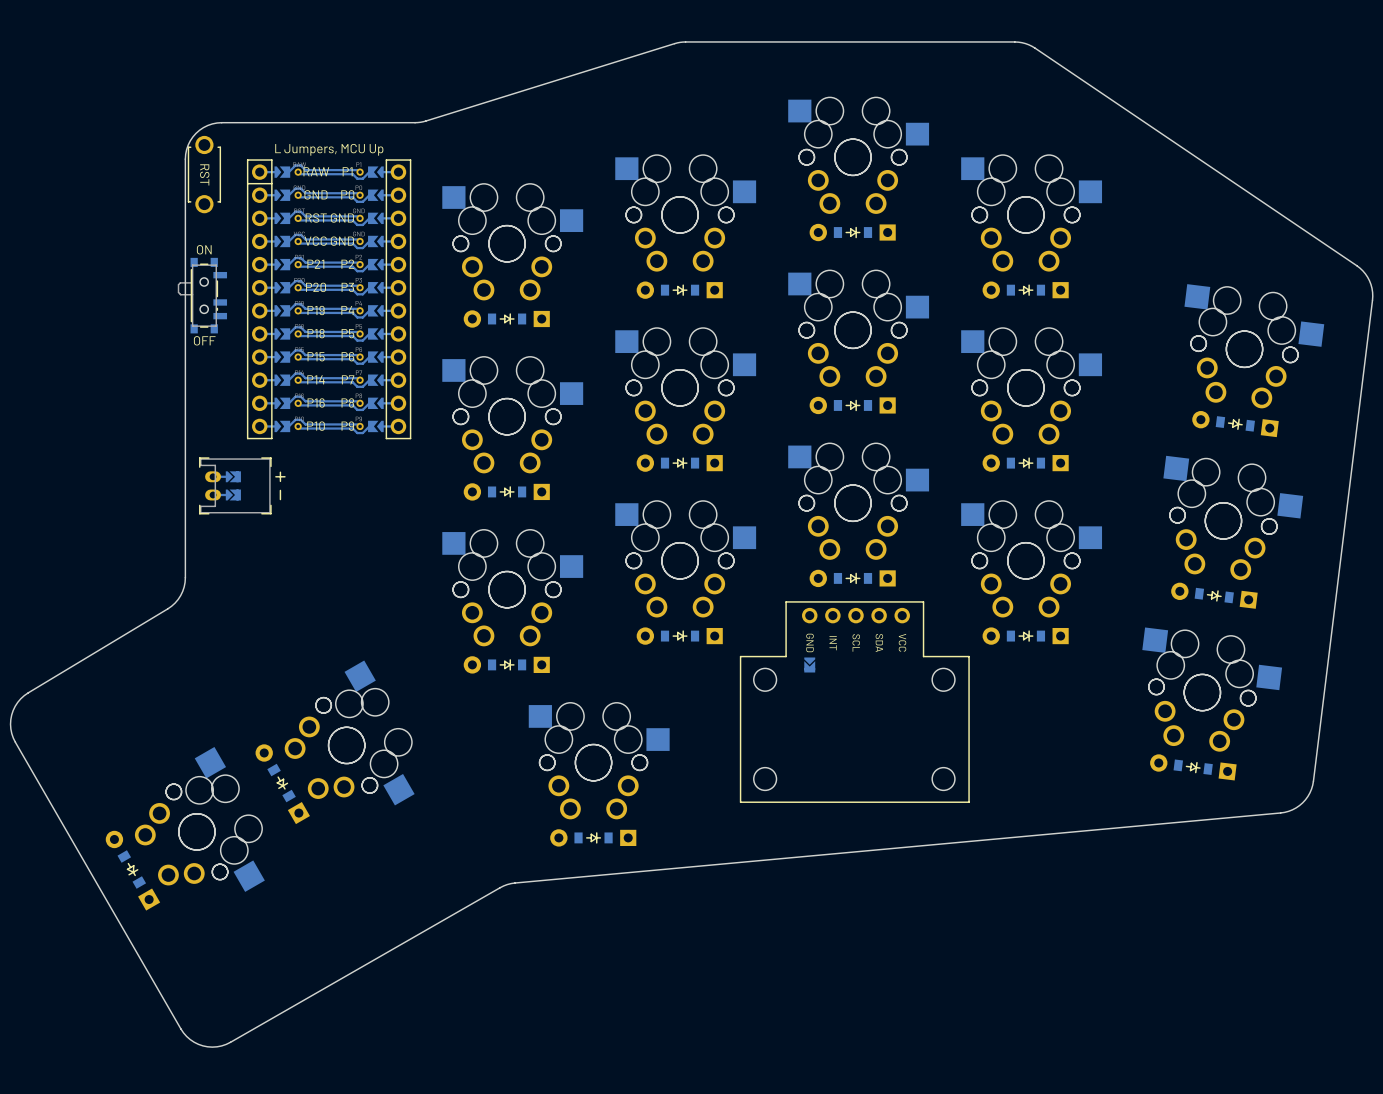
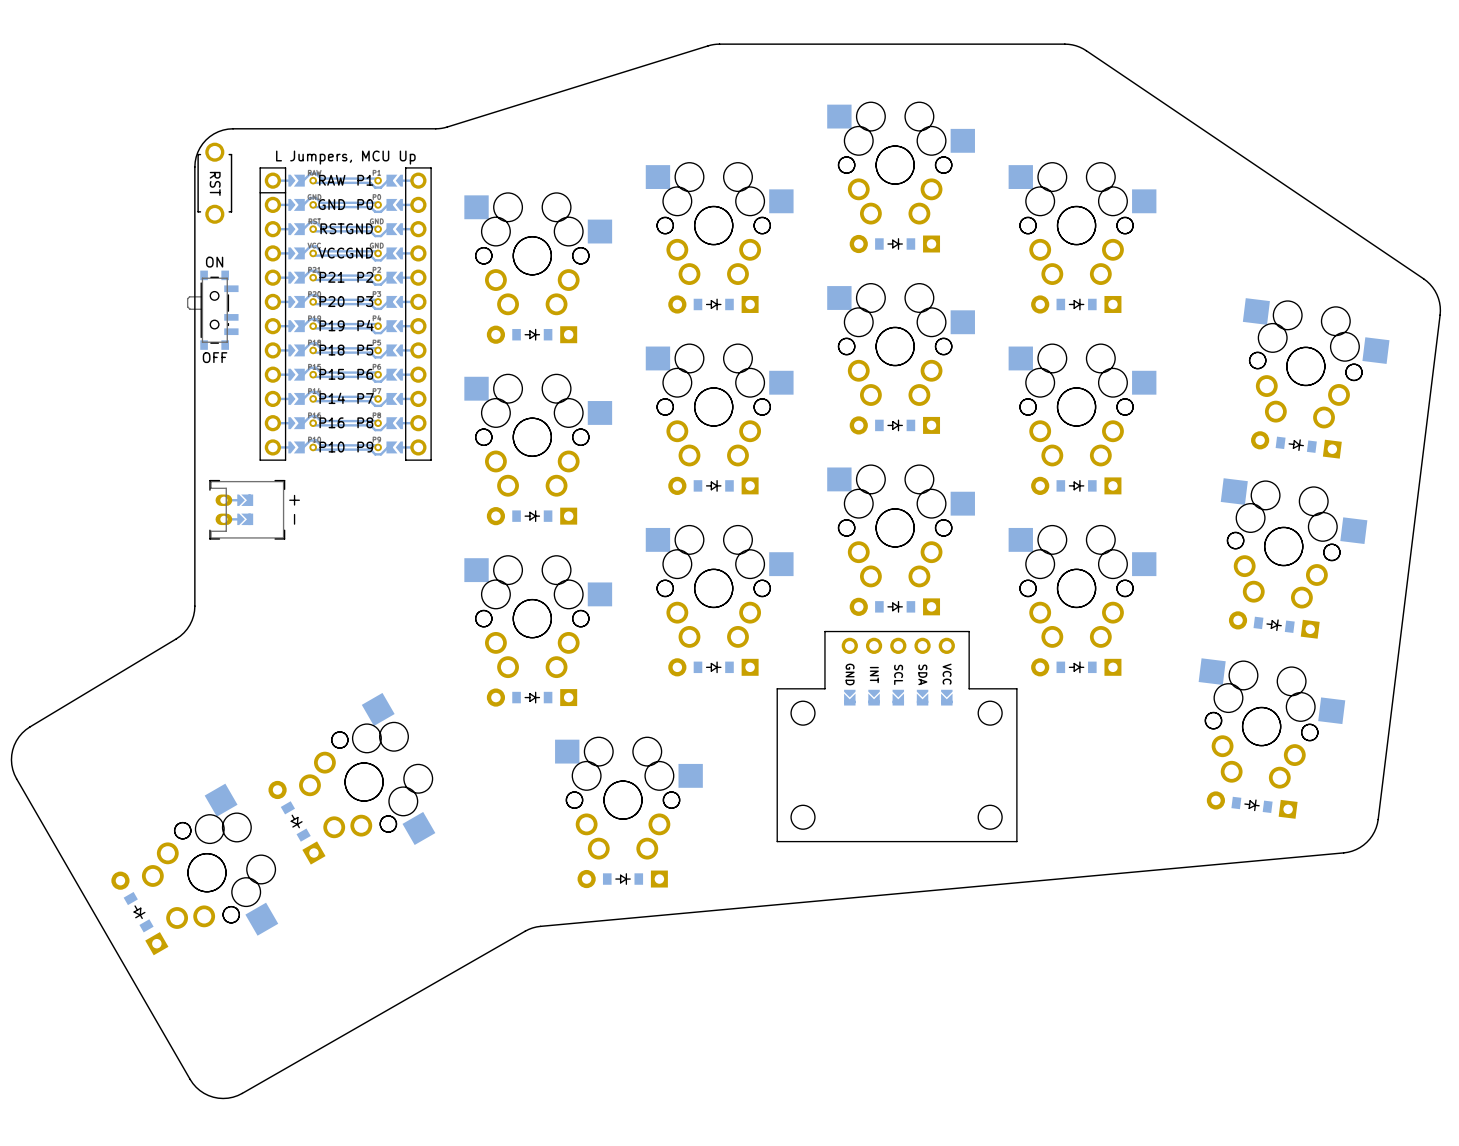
part footprint: [740, 601, 970, 803] -> [776, 630, 1018, 843]

